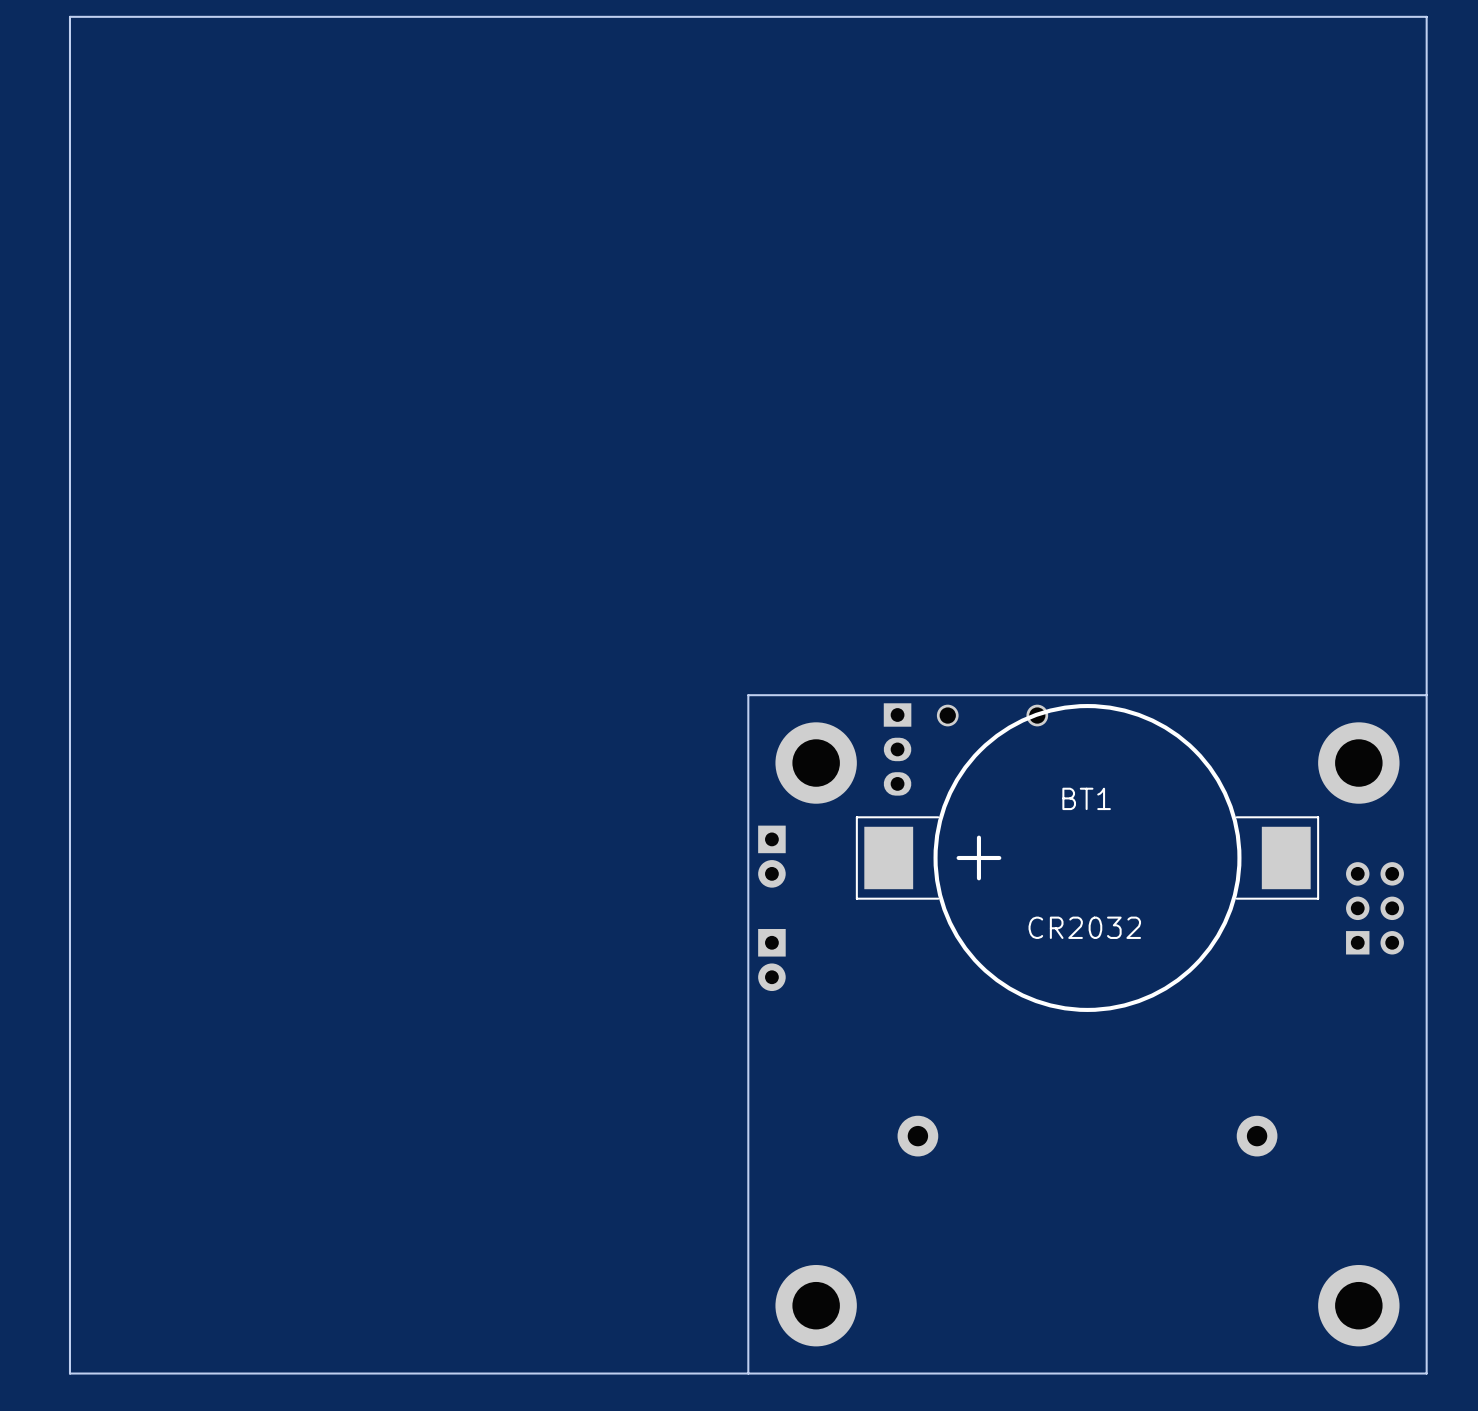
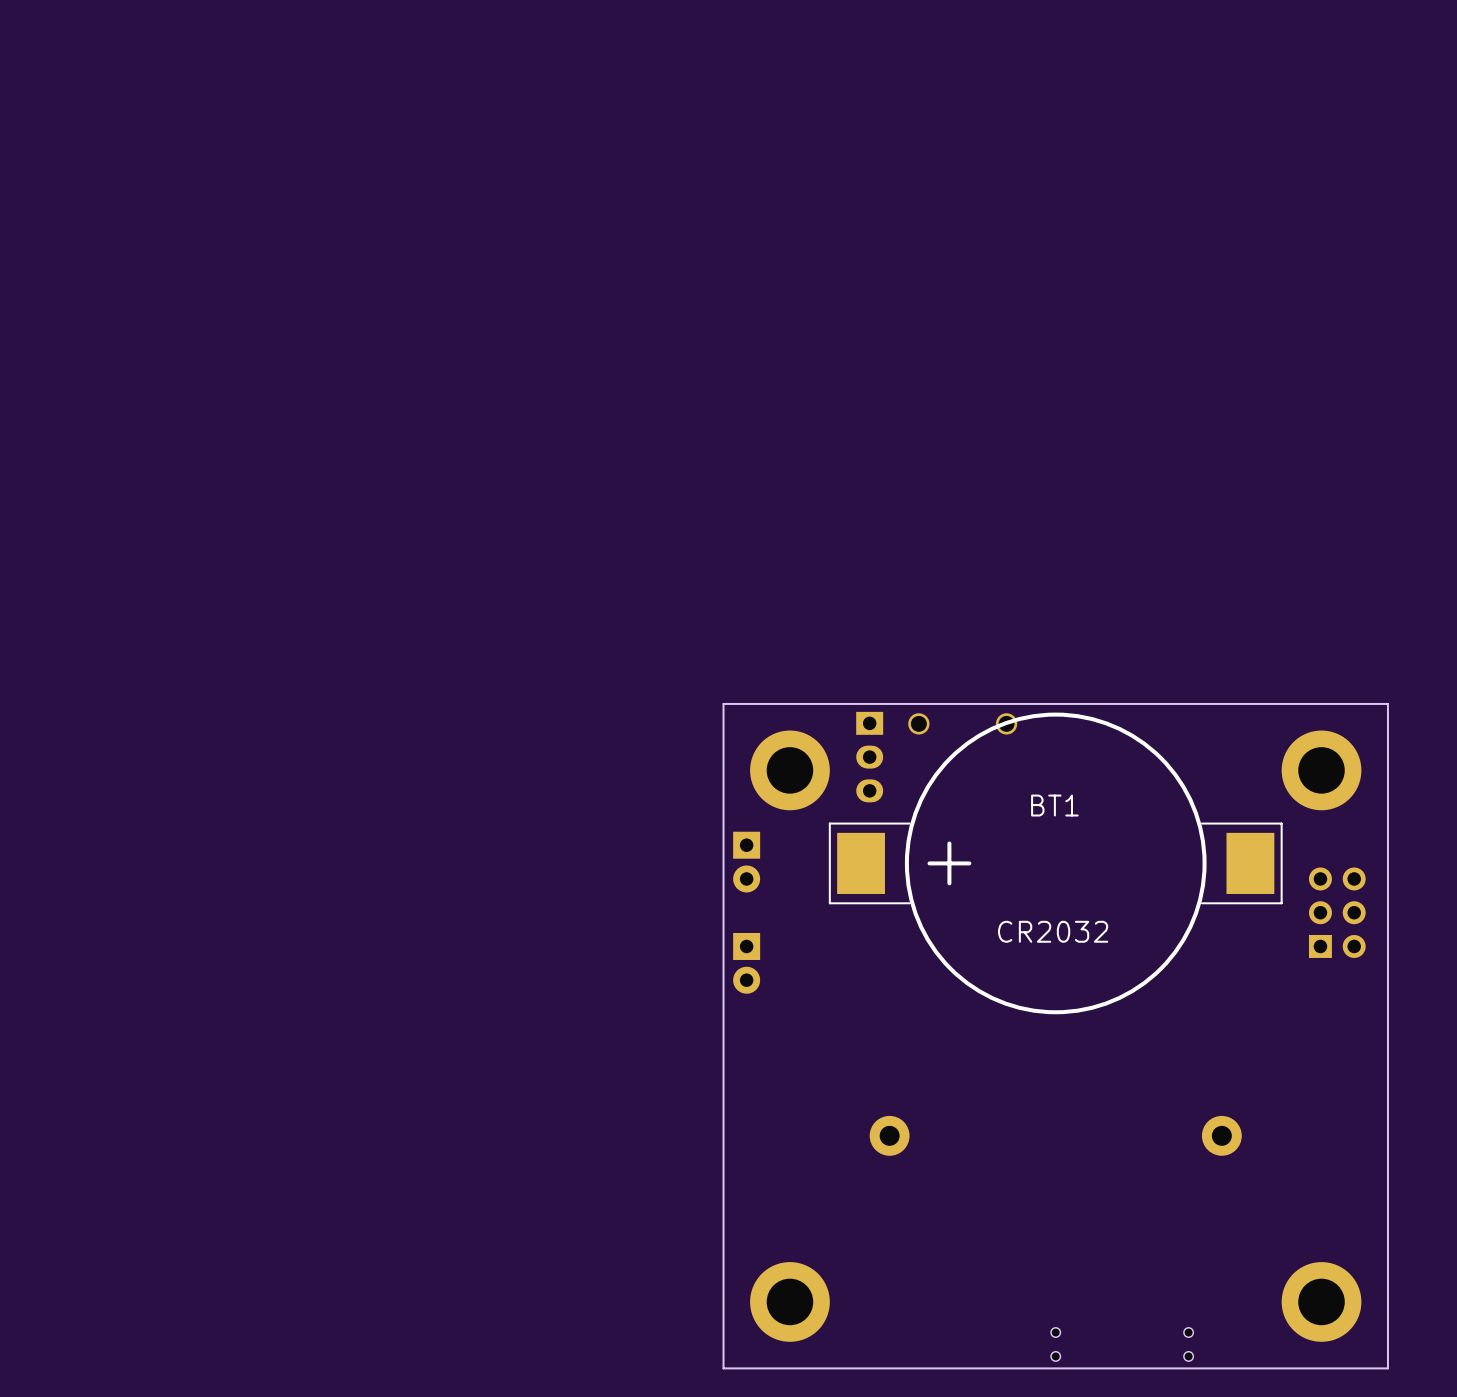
board edge: (1426, 695) (1426, 16) (69, 16) (69, 1373) (748, 1373) -> none
part: none -> (1055, 1344)
part: none -> (1188, 1344)

